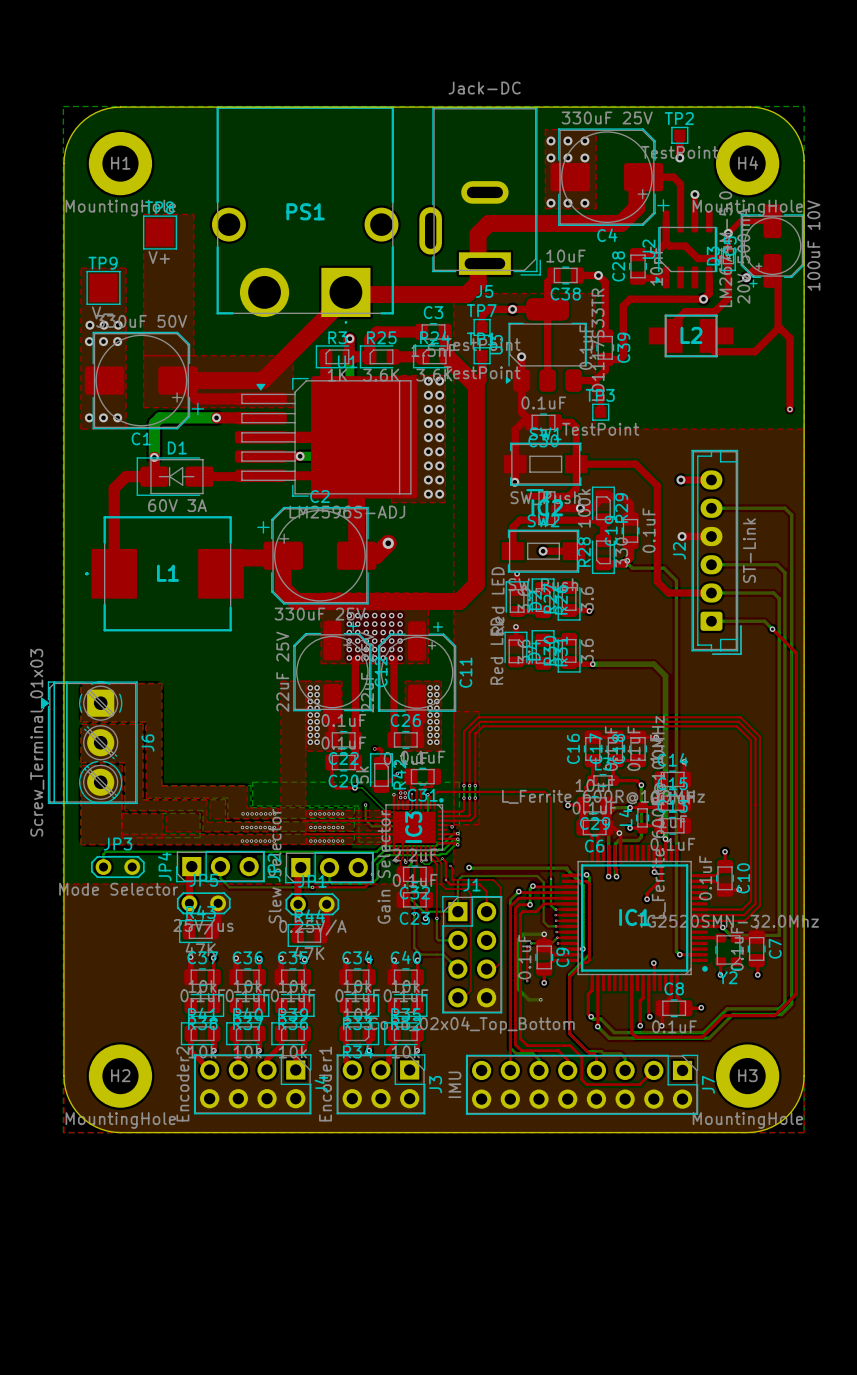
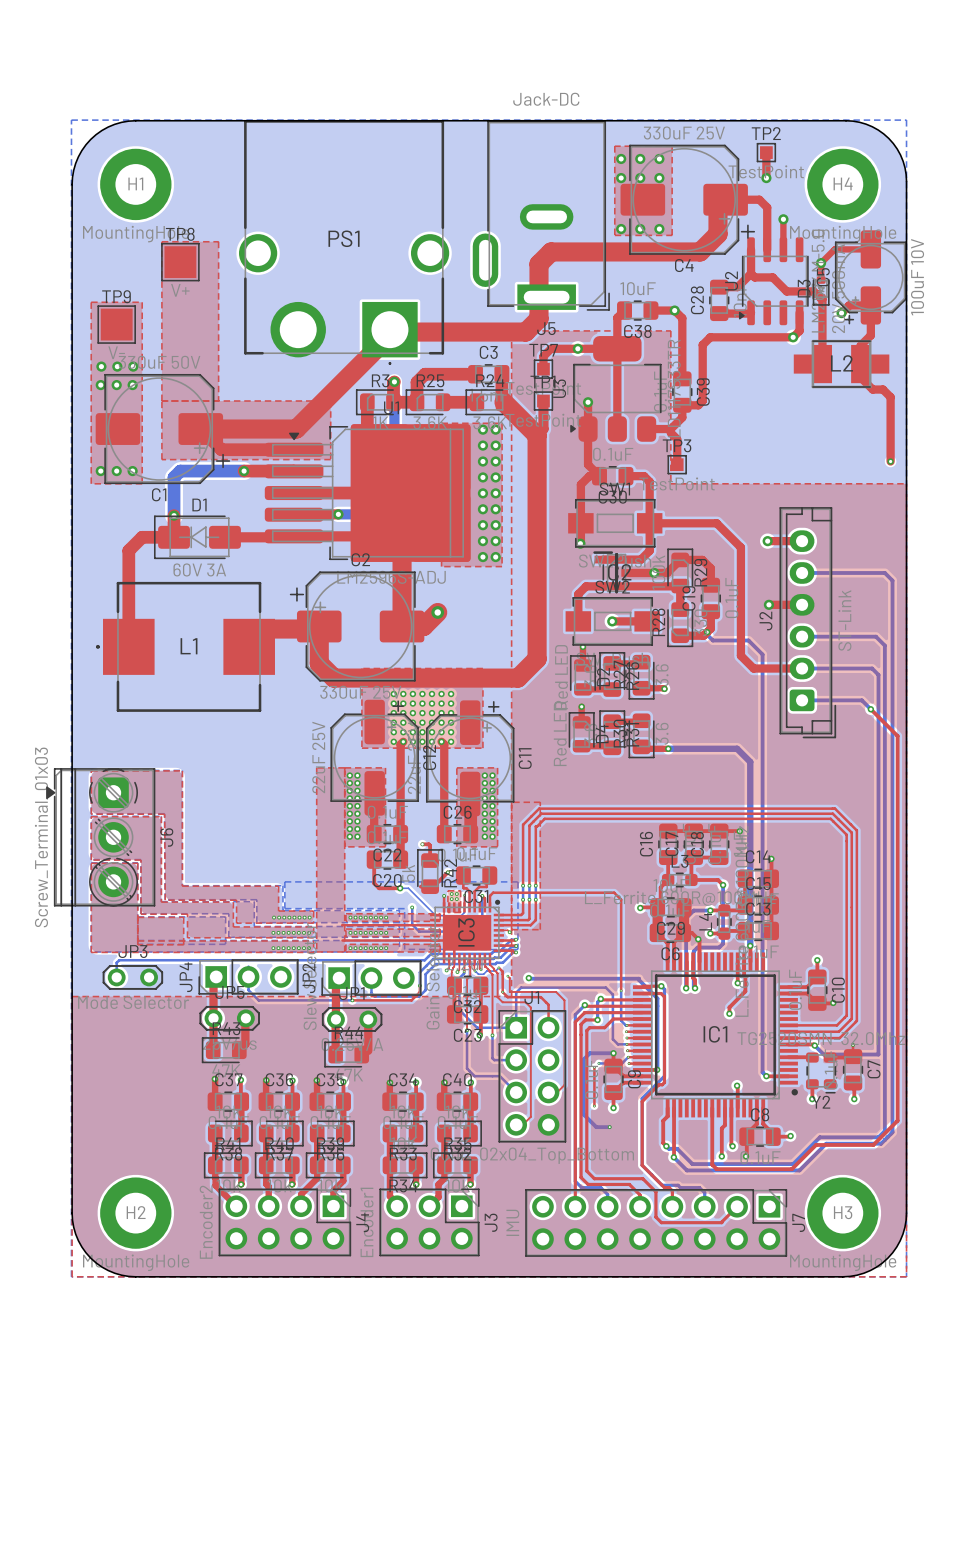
top track: (728, 264) (728, 298) (714, 311) (684, 312) (674, 322) (674, 335) -> (821, 297) (822, 364)
top track: (778, 276) (778, 328) -> none
top track: (708, 324) (708, 344) (714, 351) (754, 351) (778, 328) -> none
top track: (778, 328) (790, 338) (790, 352) -> (870, 305) (870, 335) (860, 345) (860, 377) (872, 389) (882, 389) (890, 397)
L2 position: (691, 335) -> (841, 364)

